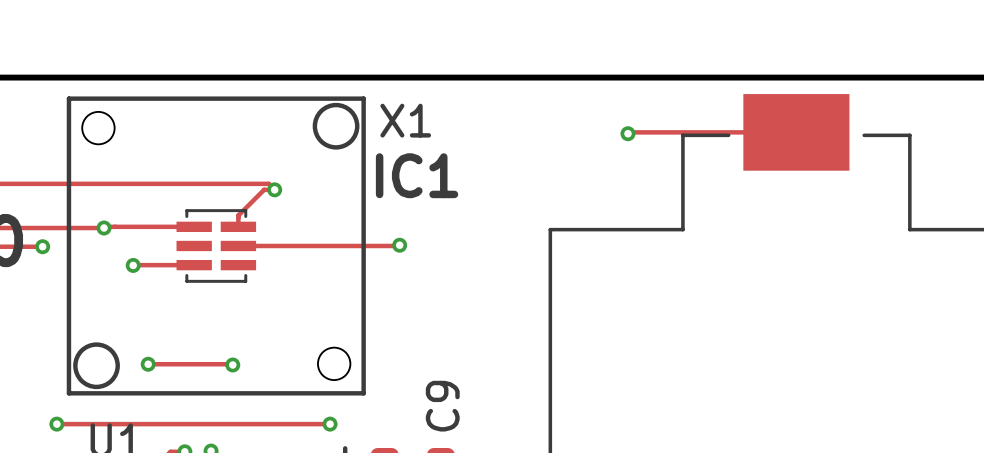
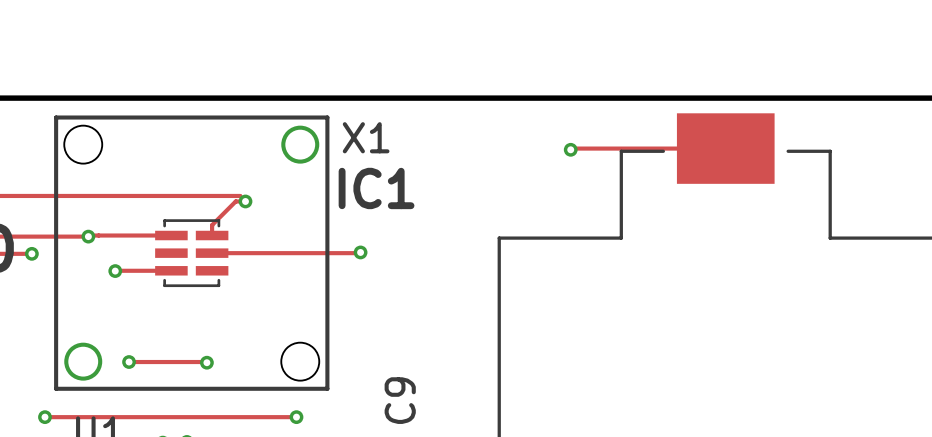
X1 footprint: [66, 96, 366, 396] -> [54, 115, 330, 391]

